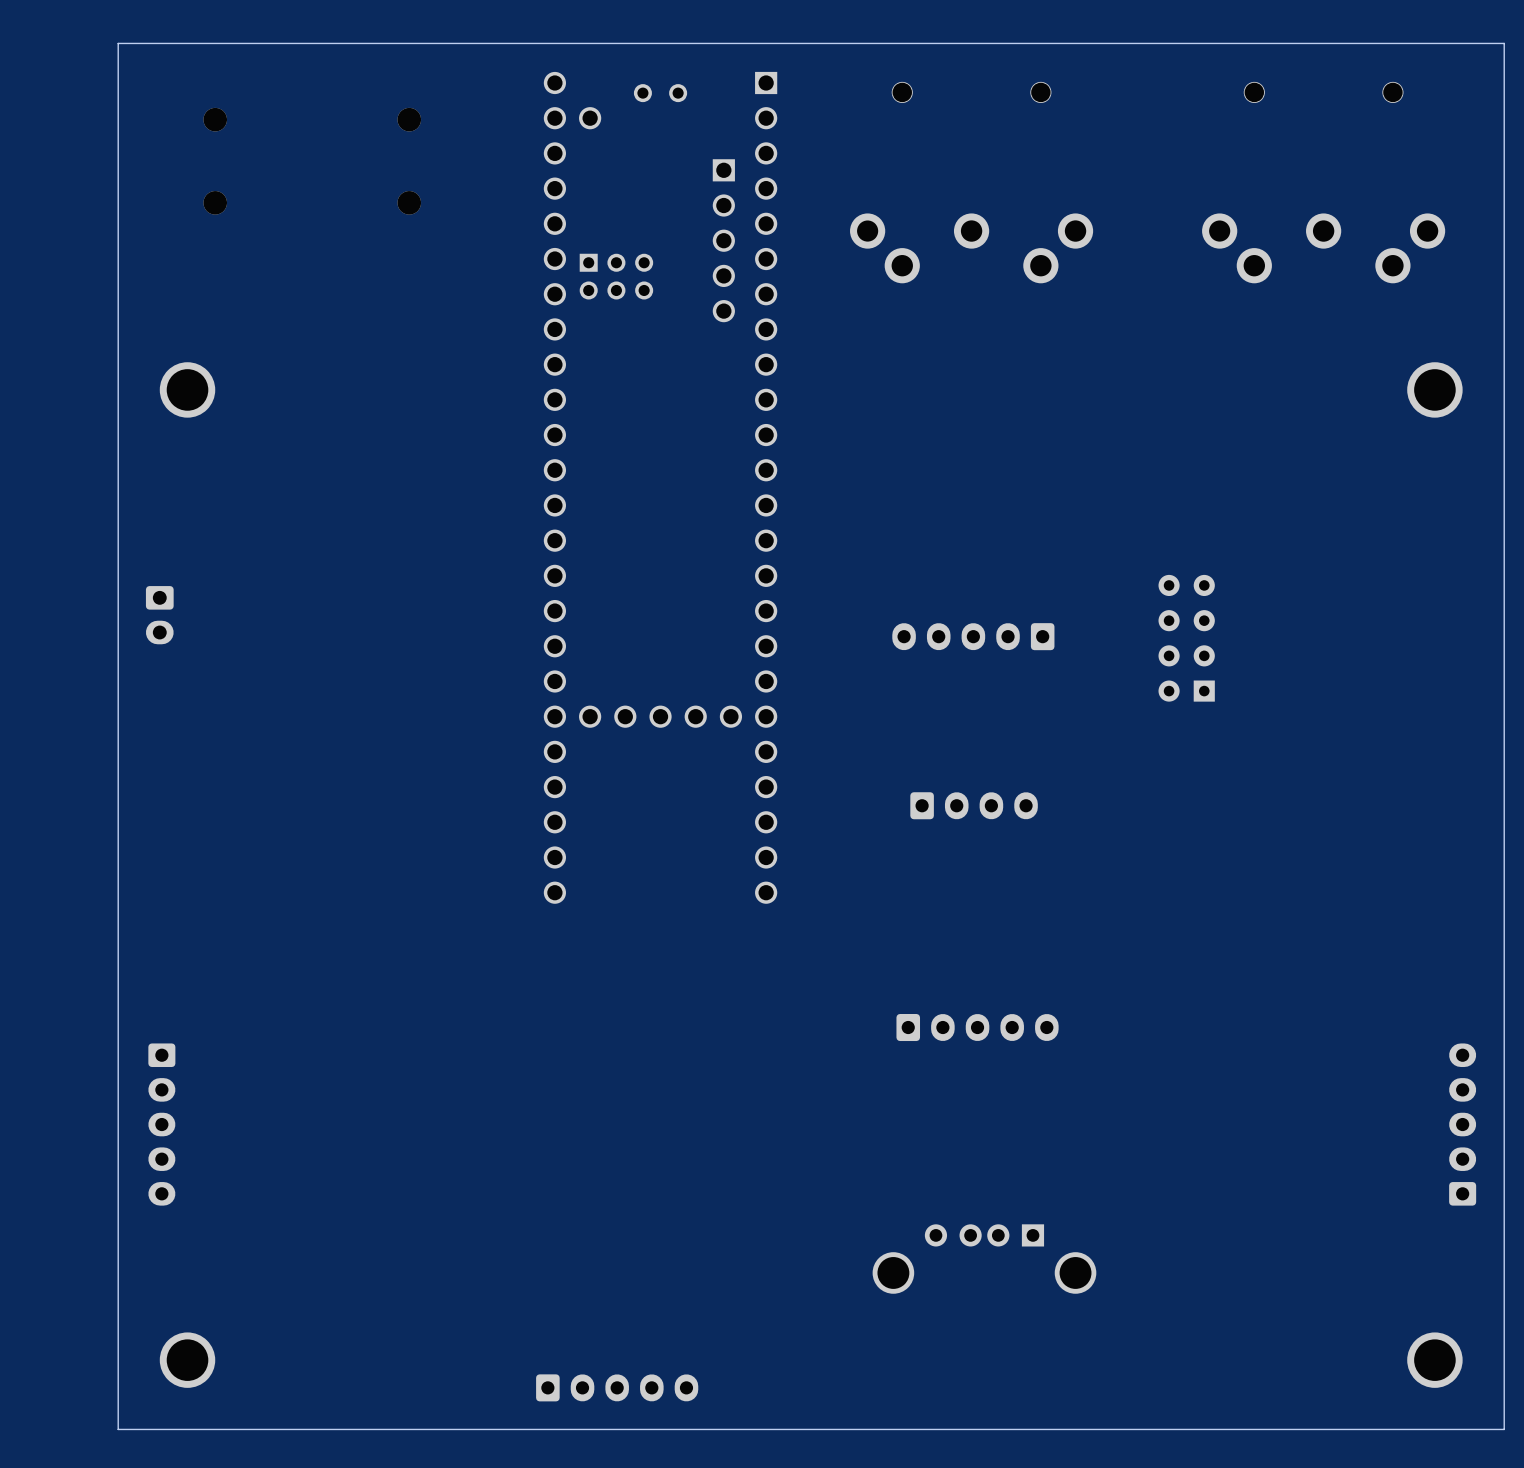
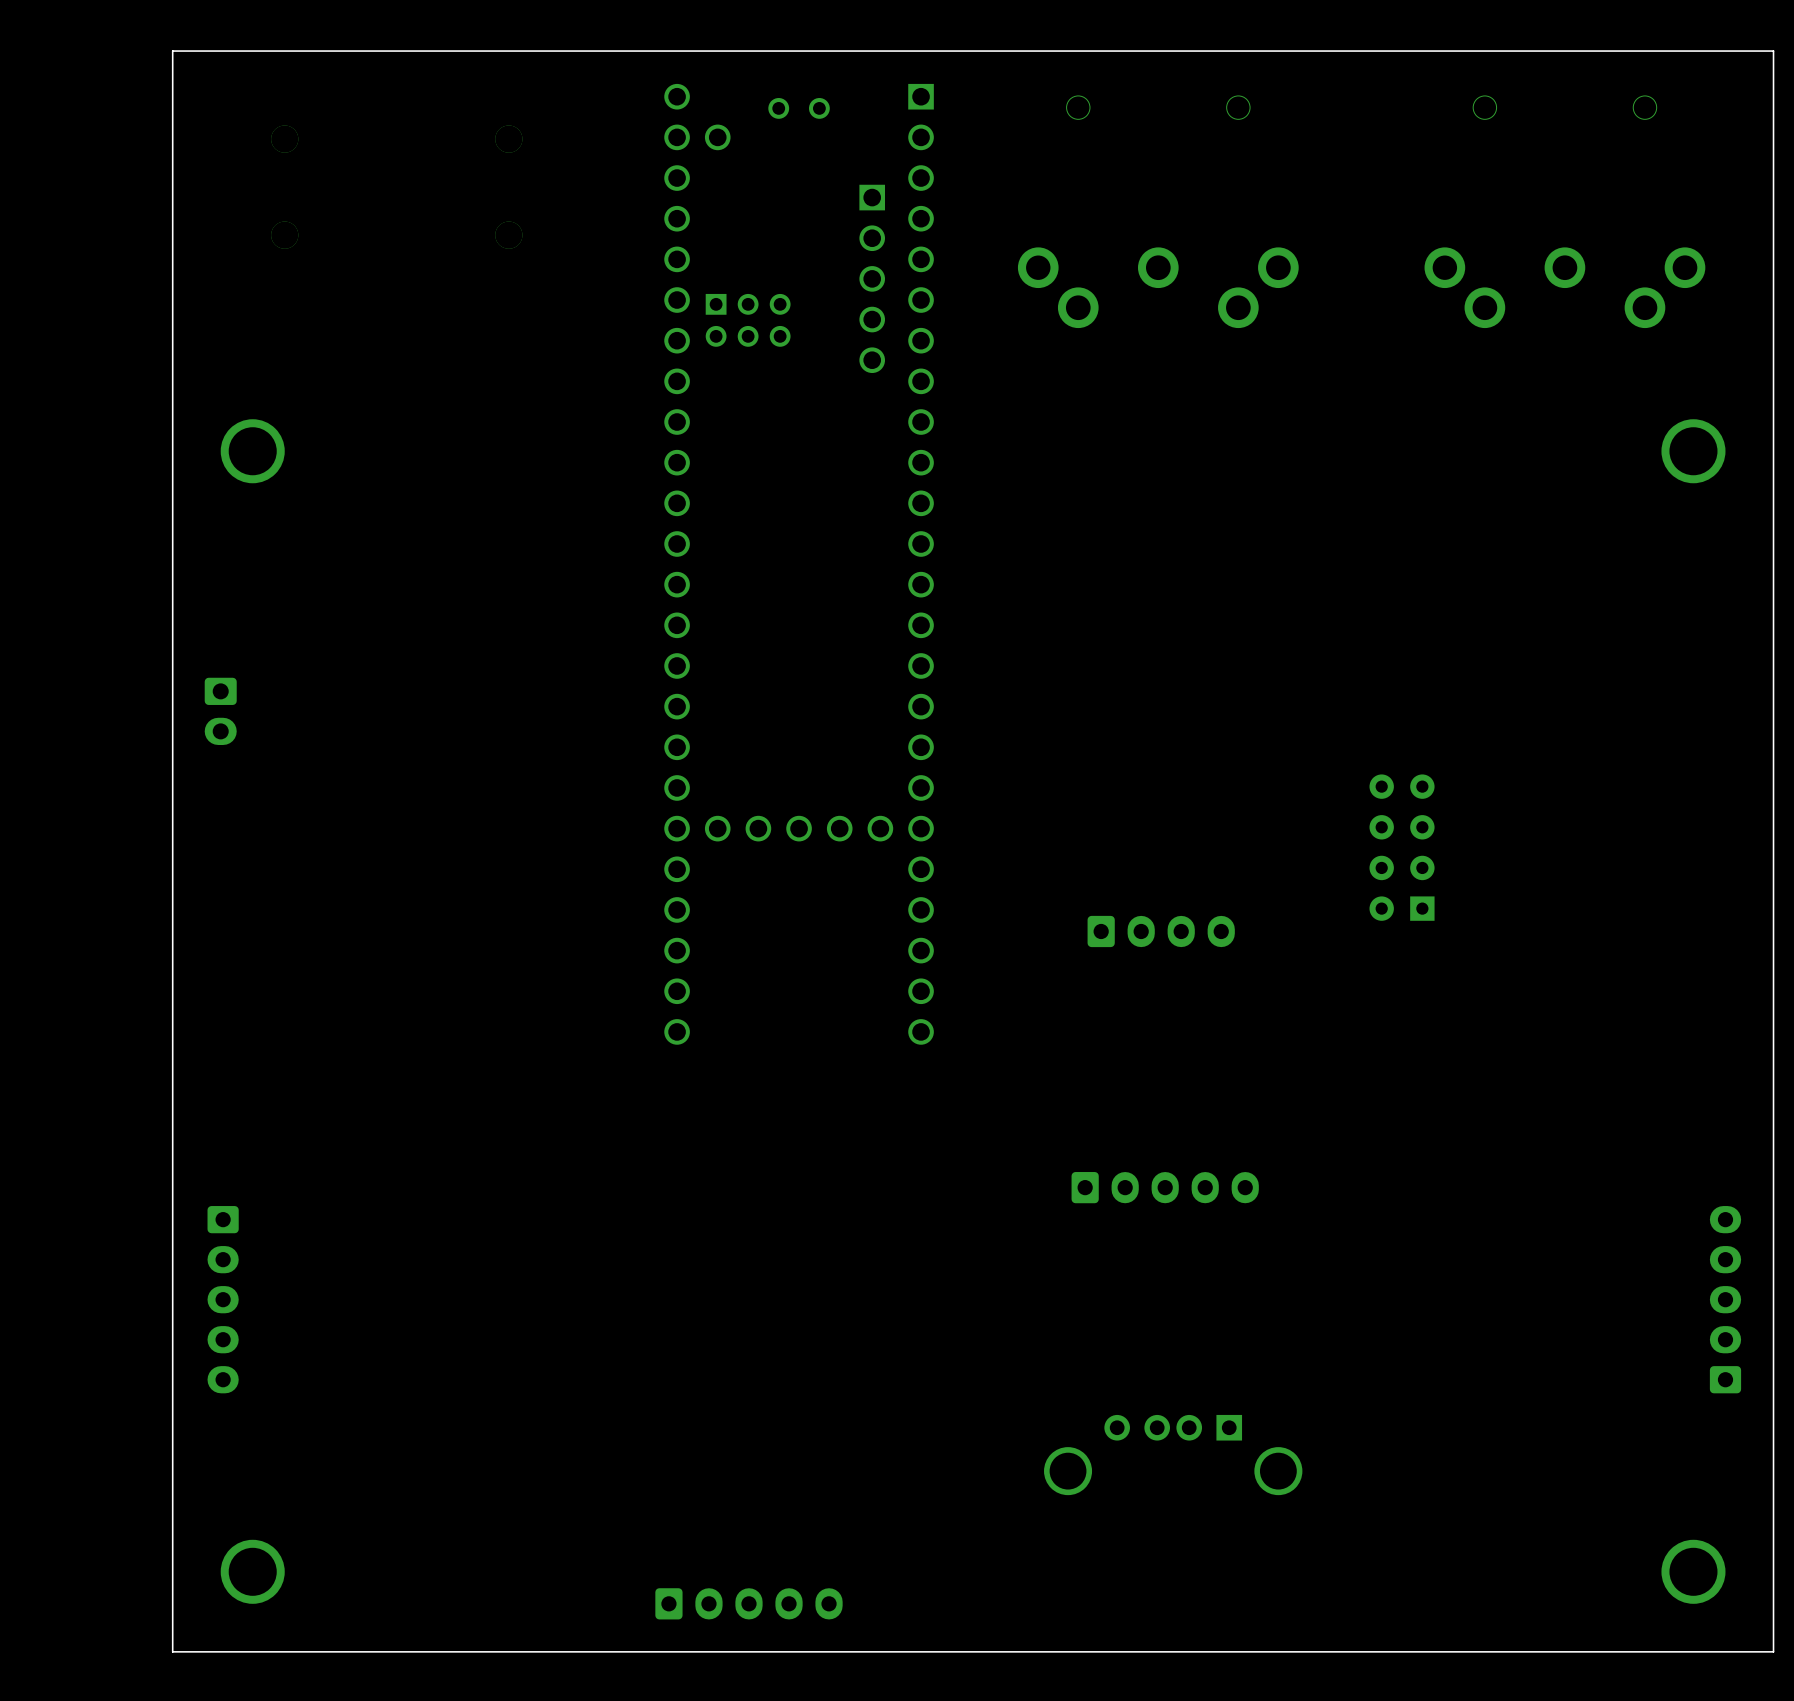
part: (973, 636) -> none
part position: (1186, 638) -> (1402, 847)

